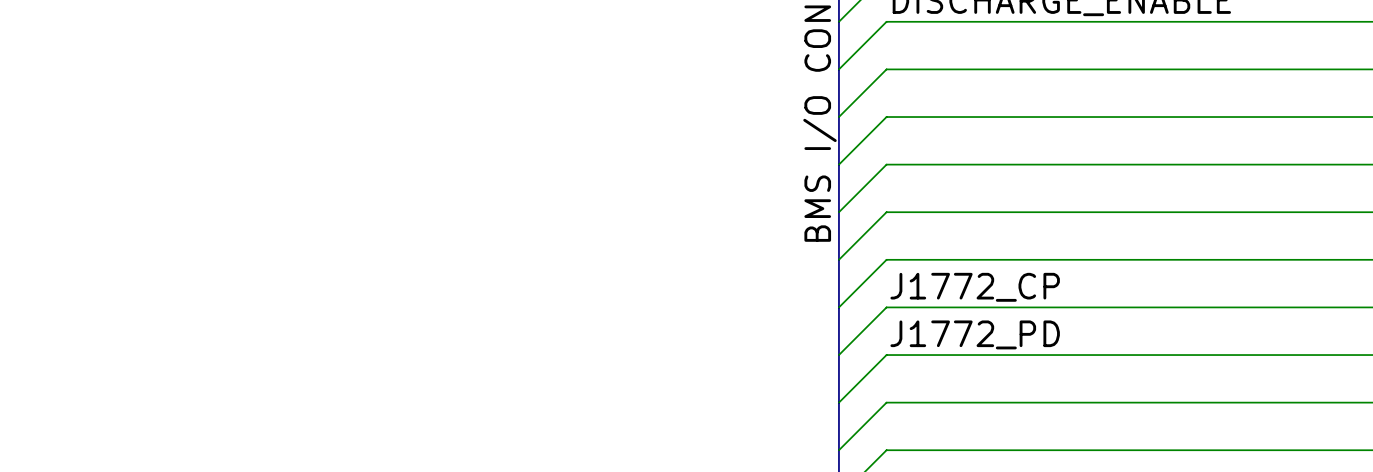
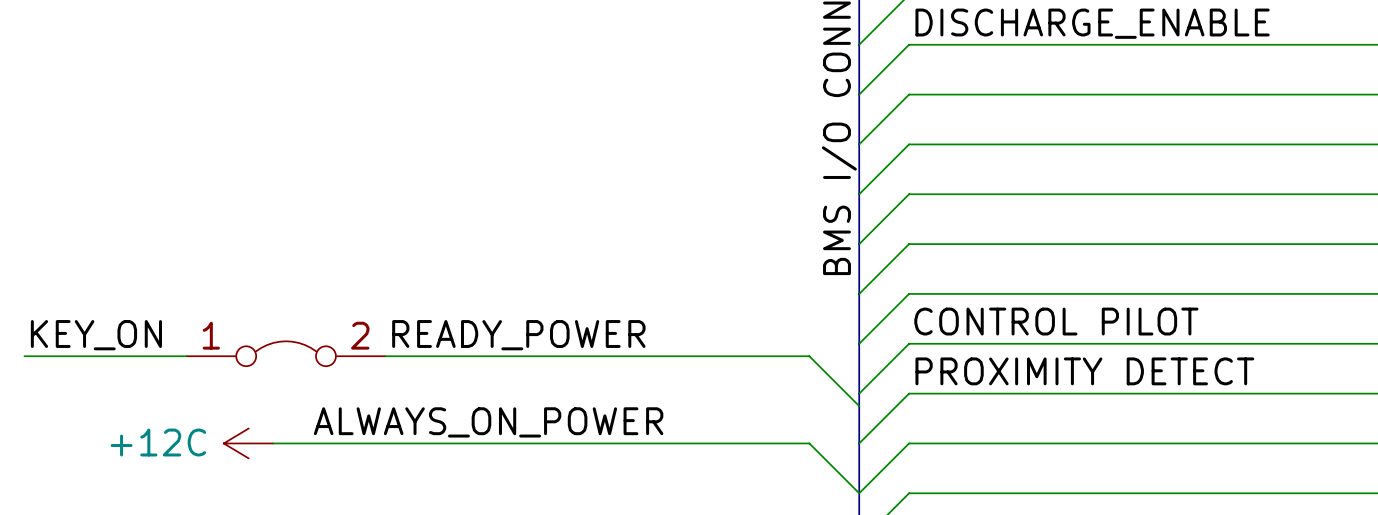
label: J1772_CP (975, 287) -> CONTROL PILOT (1056, 321)
label: none -> KEY_ON (96, 335)
label: none -> READY_POWER (518, 335)
part: none -> (286, 353)
wire: none -> (24, 356) (186, 356)
wire: none -> (385, 356) (809, 356) (859, 406)
label: J1772_PD (975, 334) -> PROXIMITY DETECT (1084, 371)
label: none -> ALWAYS_ON_POWER (488, 422)
power symbol: none -> +12C (248, 443)
wire: none -> (273, 443) (809, 443) (859, 493)

